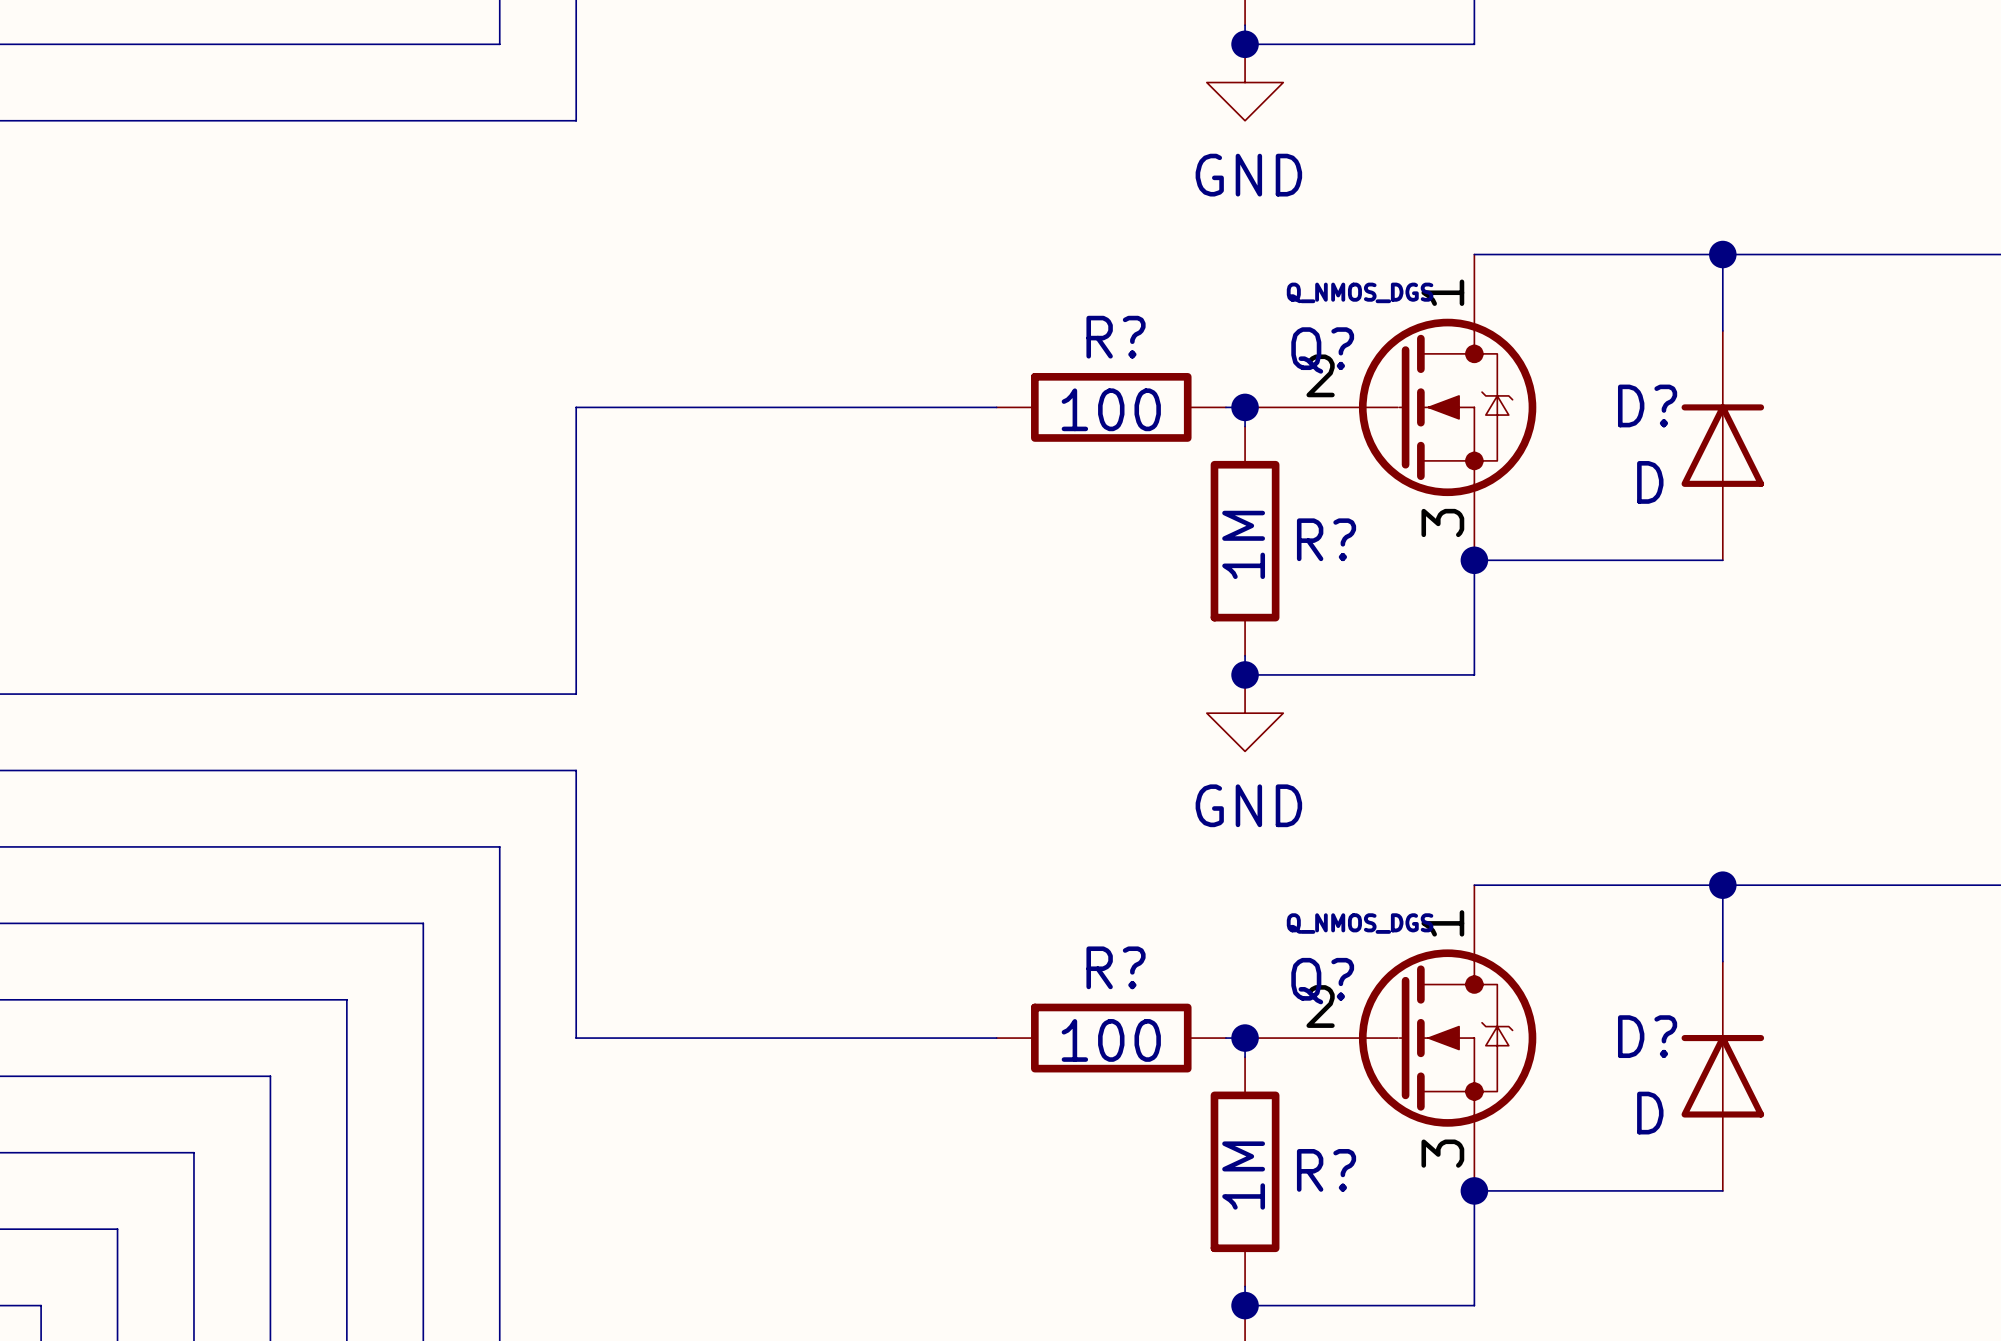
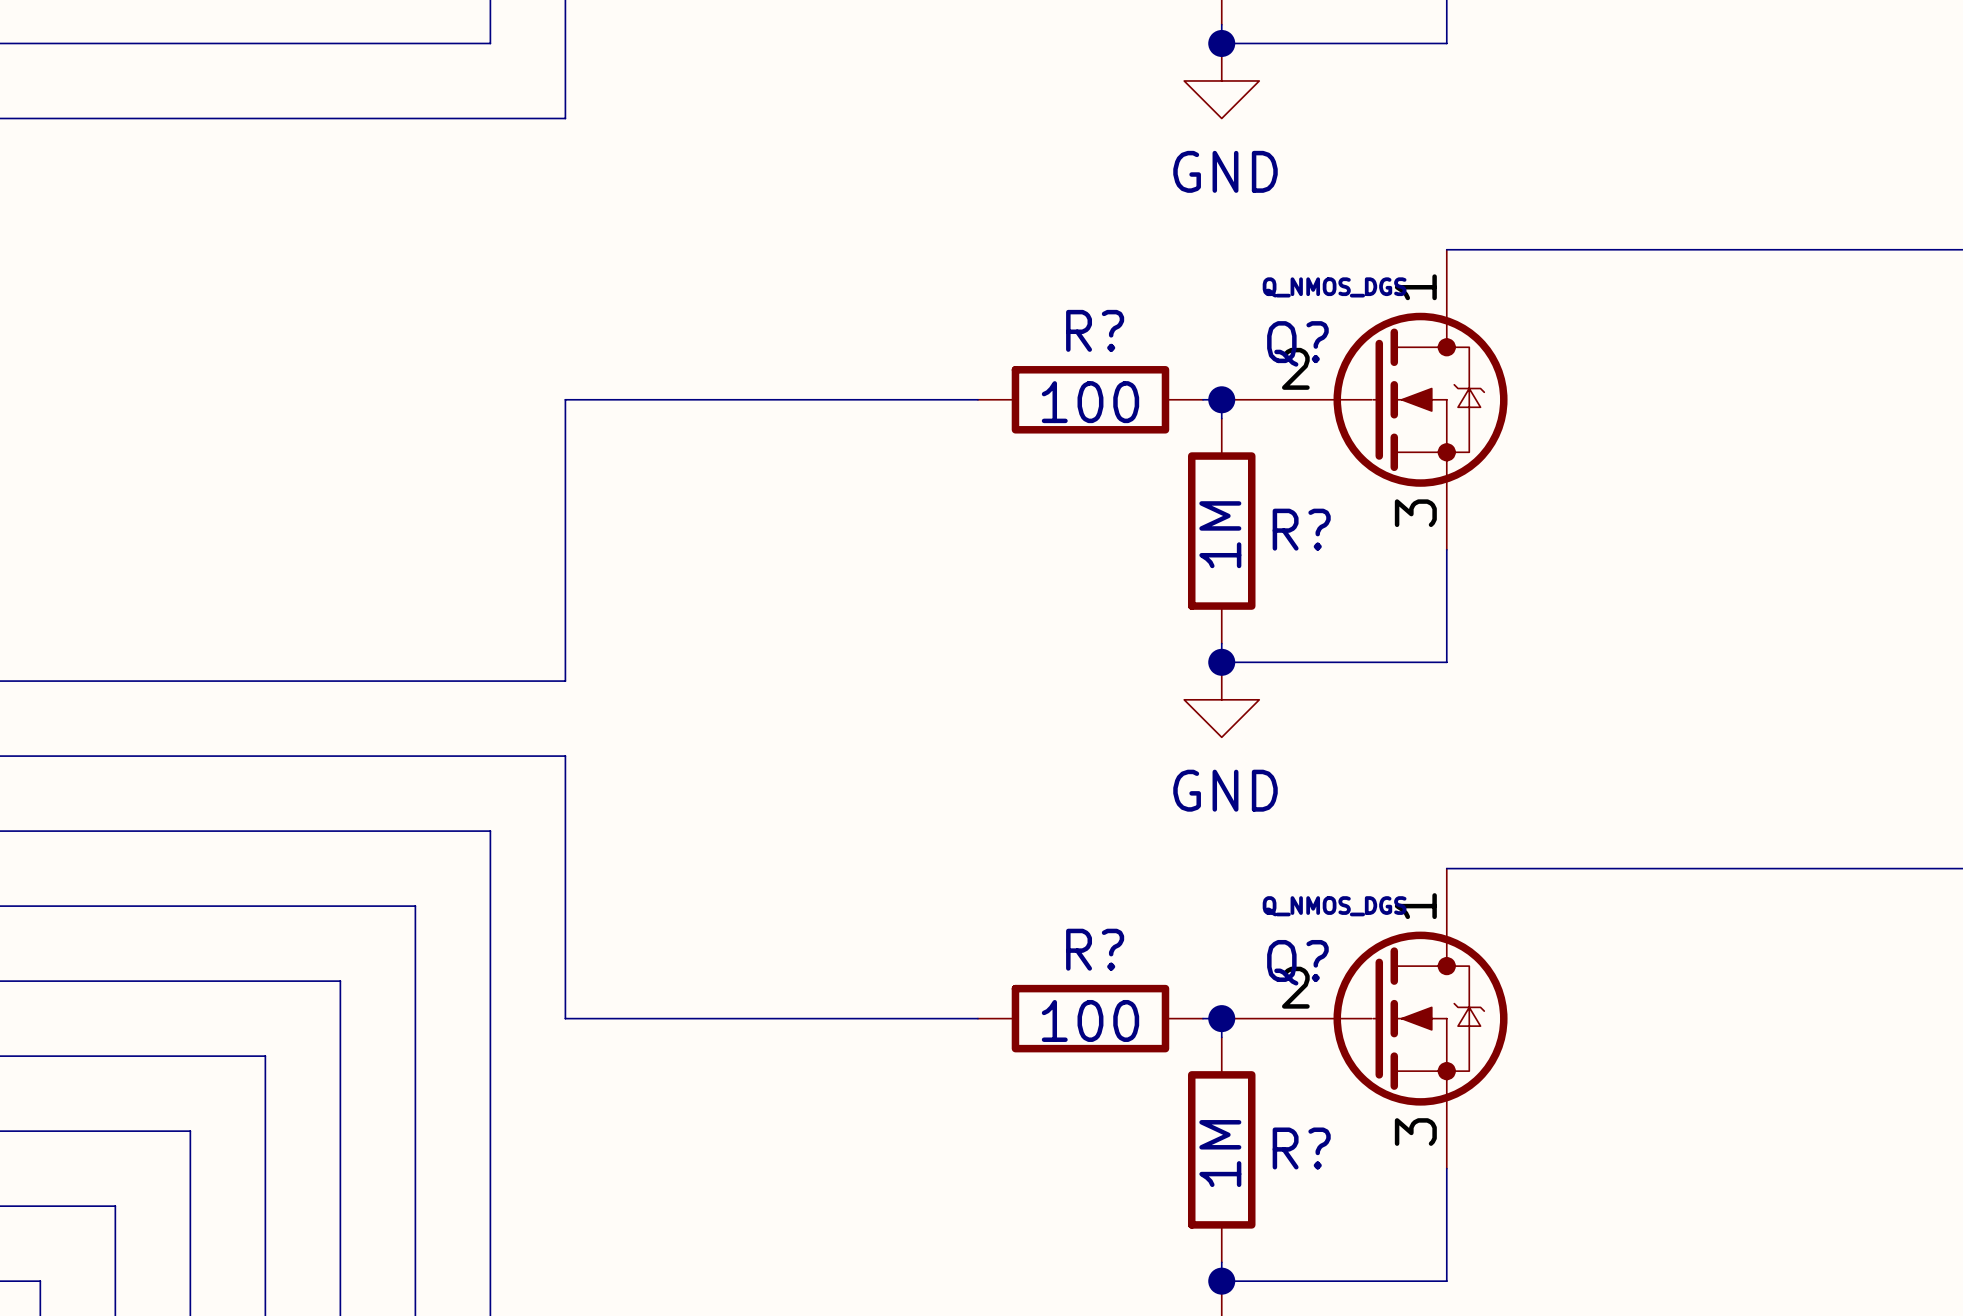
wire: (1722, 254) (1722, 330) -> none
junction: (1722, 254) -> none
D?: D (1722, 445) -> none
wire: (1474, 560) (1722, 560) -> none
junction: (1474, 560) -> none
wire: (1722, 885) (1722, 961) -> none
junction: (1722, 885) -> none
D?: D (1722, 1076) -> none
wire: (1474, 1190) (1722, 1190) -> none
junction: (1474, 1190) -> none

